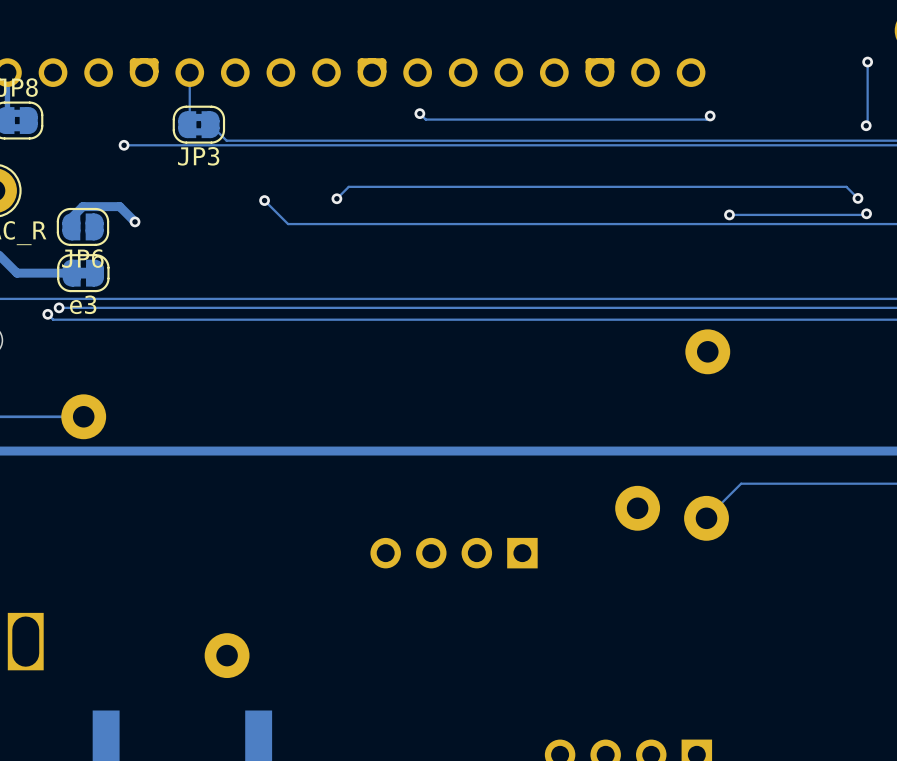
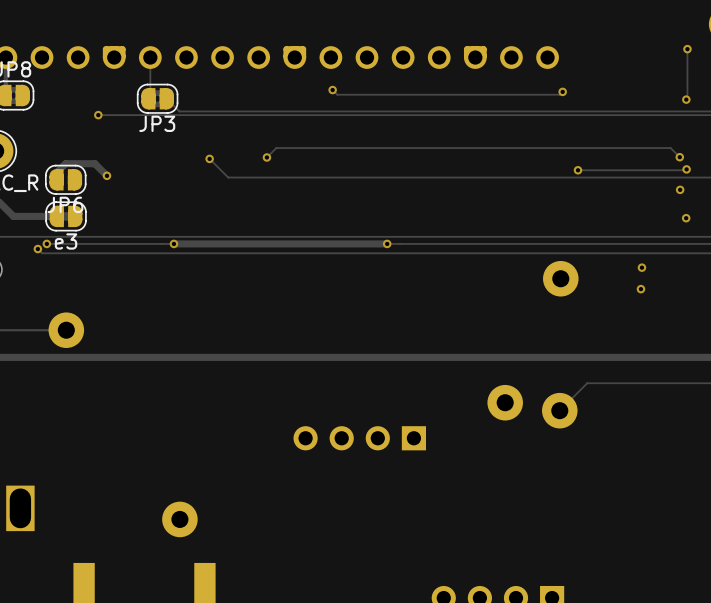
via: none -> (680, 189)
via: none -> (686, 218)
via: none -> (173, 243)
track width: thin (488, 307) (219, 307) -> thick (387, 243) (173, 243)
via: none -> (387, 243)
via: none -> (641, 267)
via: none -> (640, 289)

